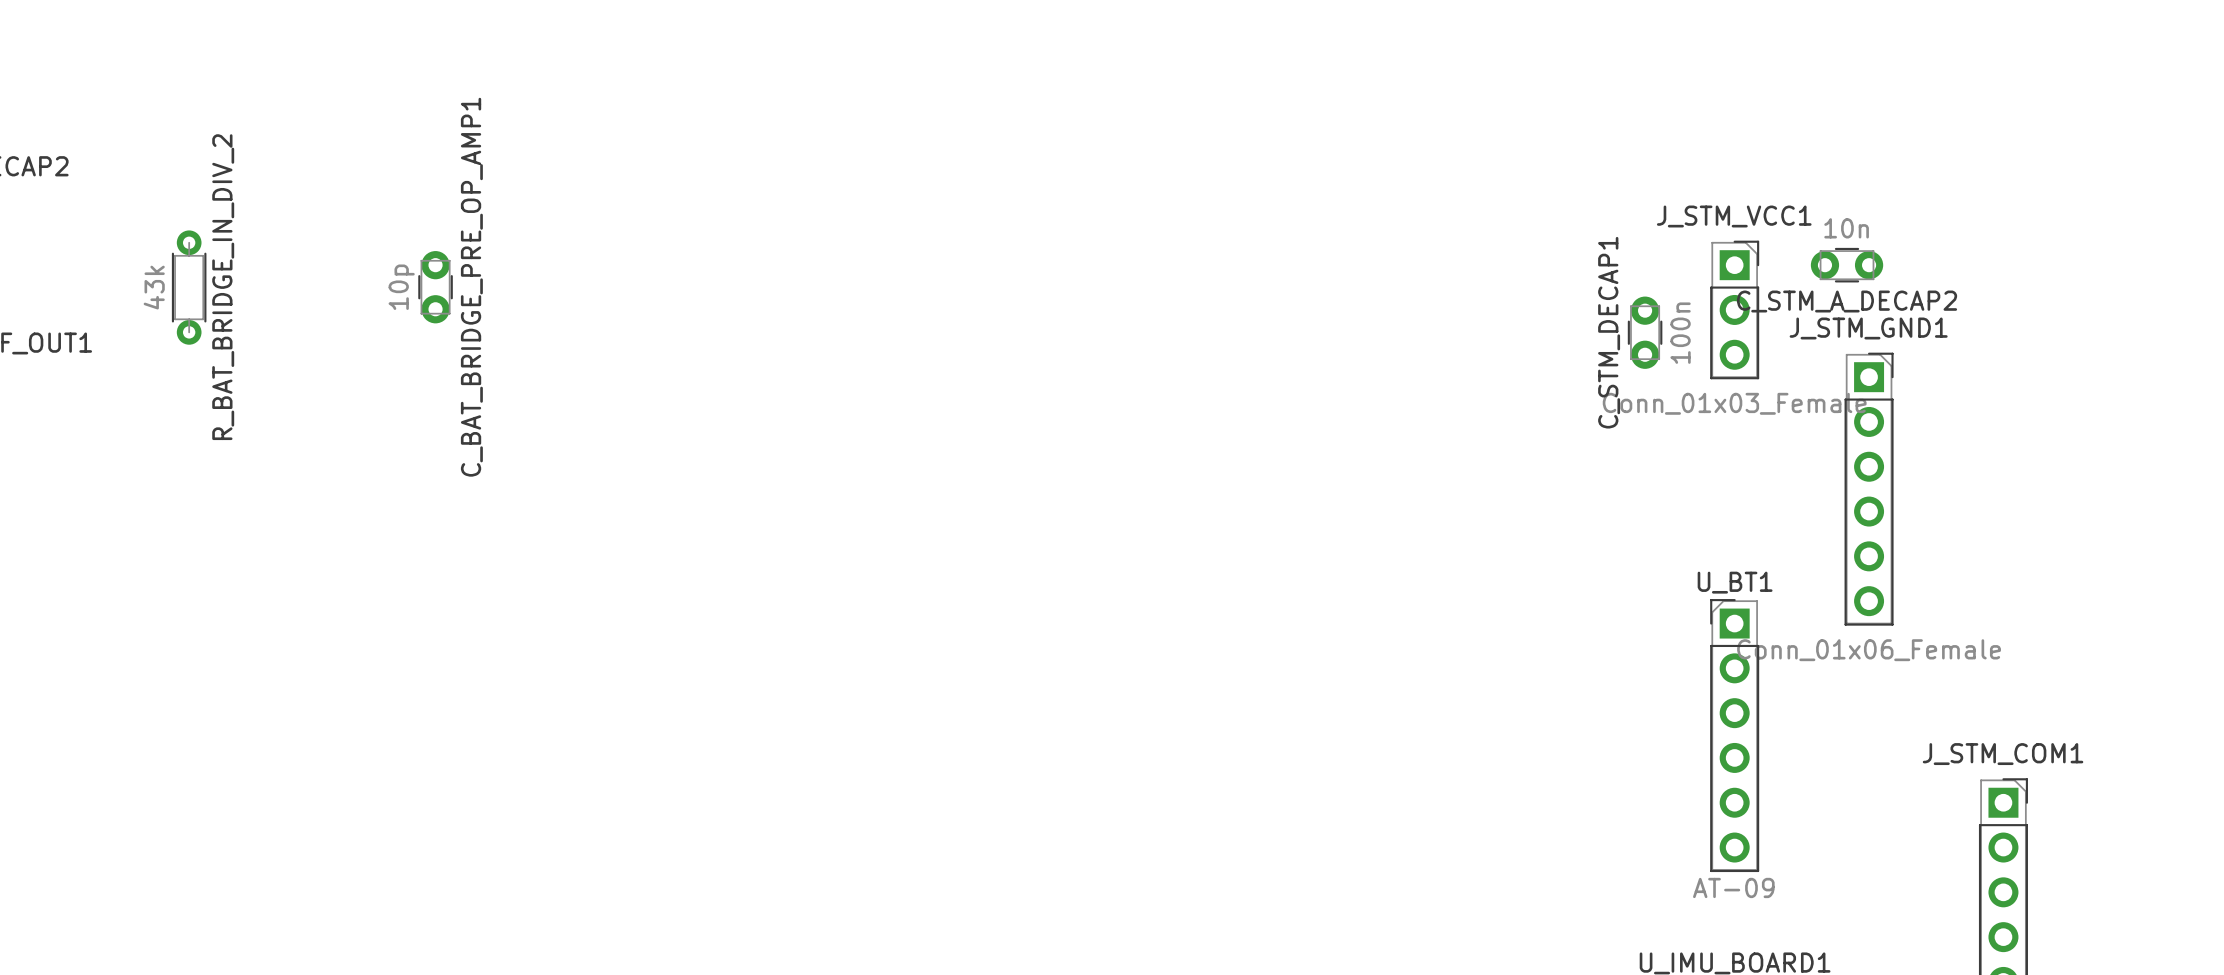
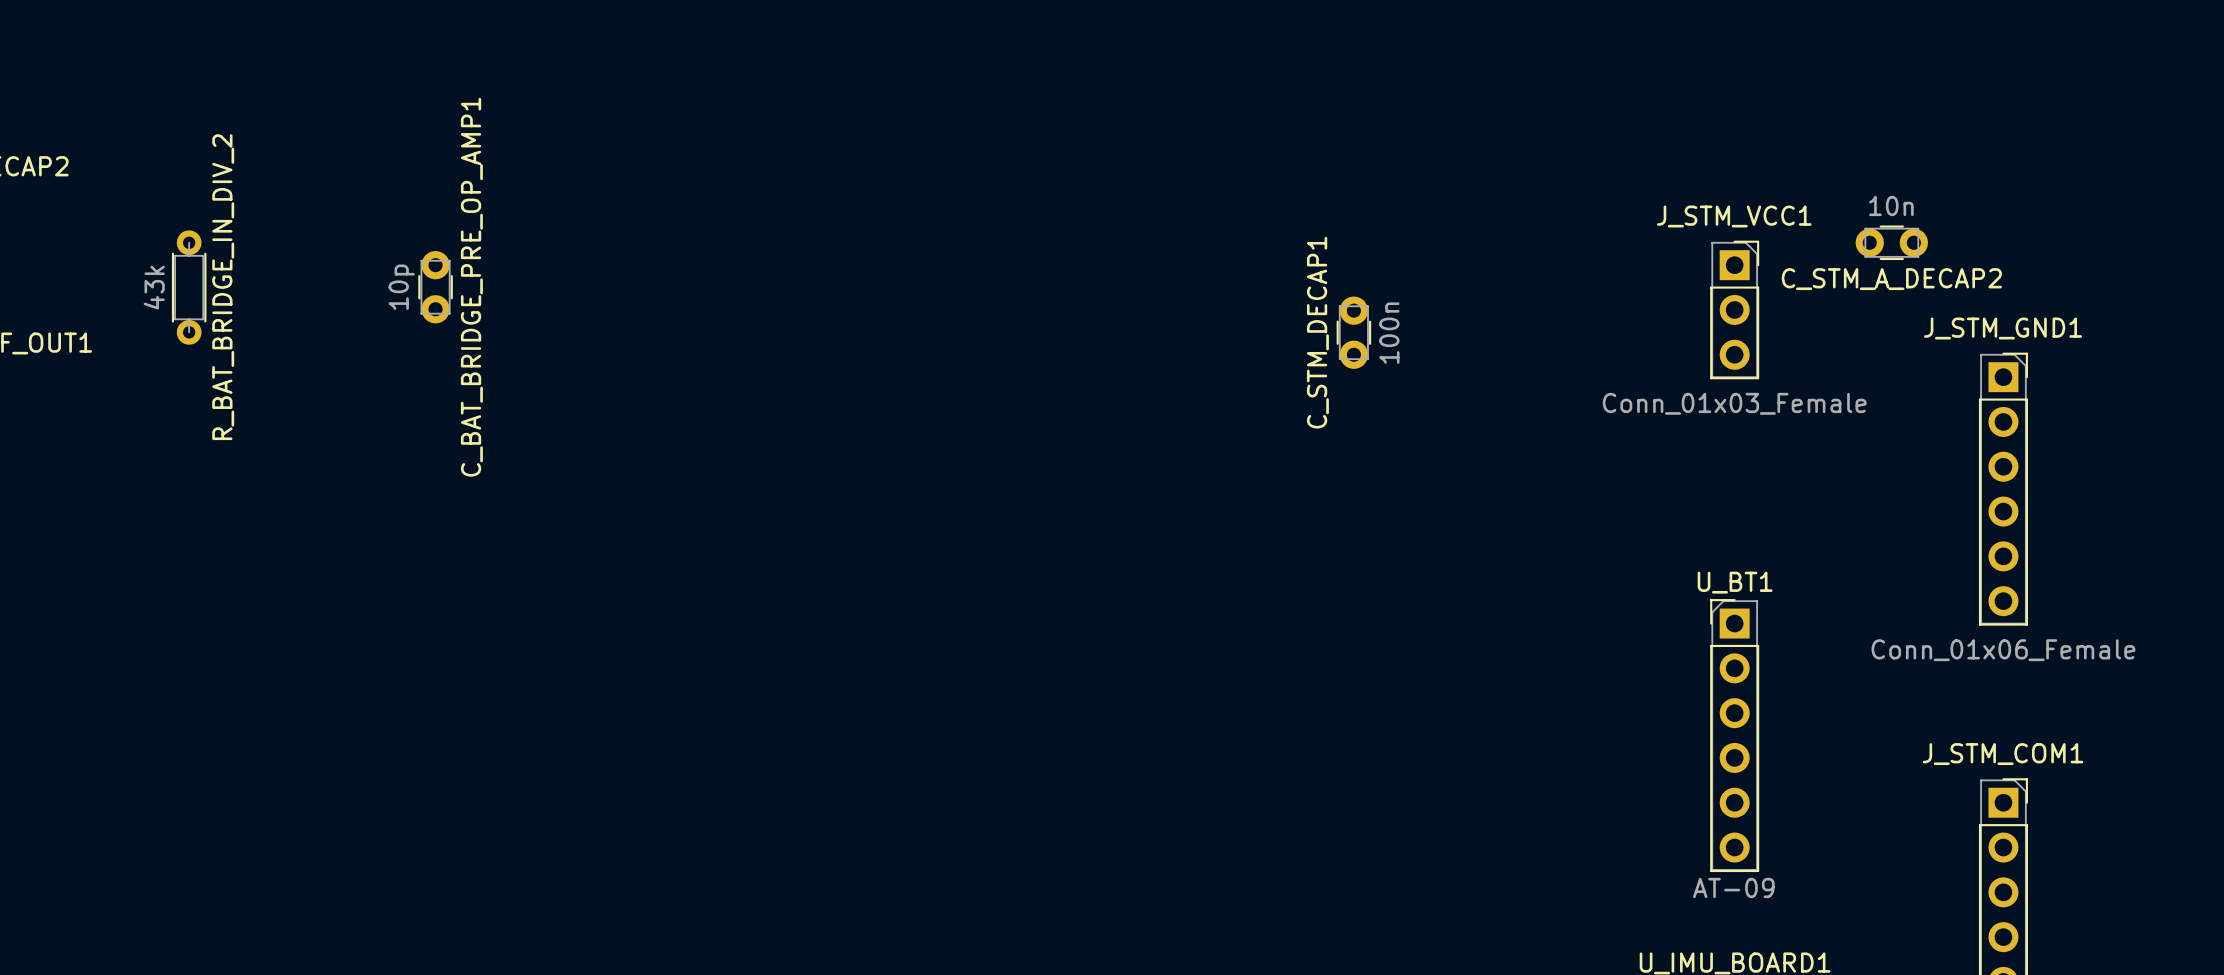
C_STM_A_DECAP2 position: (1847, 265) -> (1891, 242)
C_STM_DECAP1 position: (1645, 332) -> (1353, 332)
J_STM_GND1 position: (1869, 489) -> (2003, 489)

